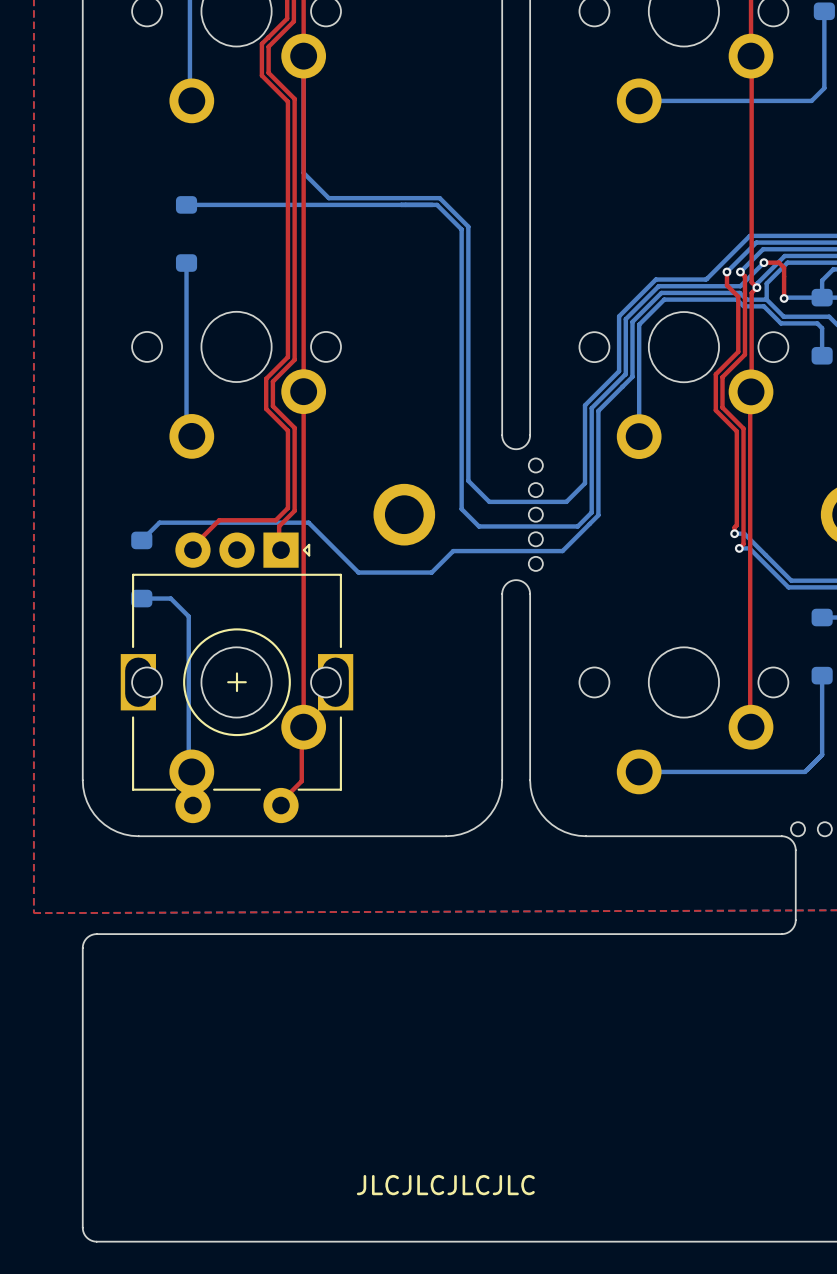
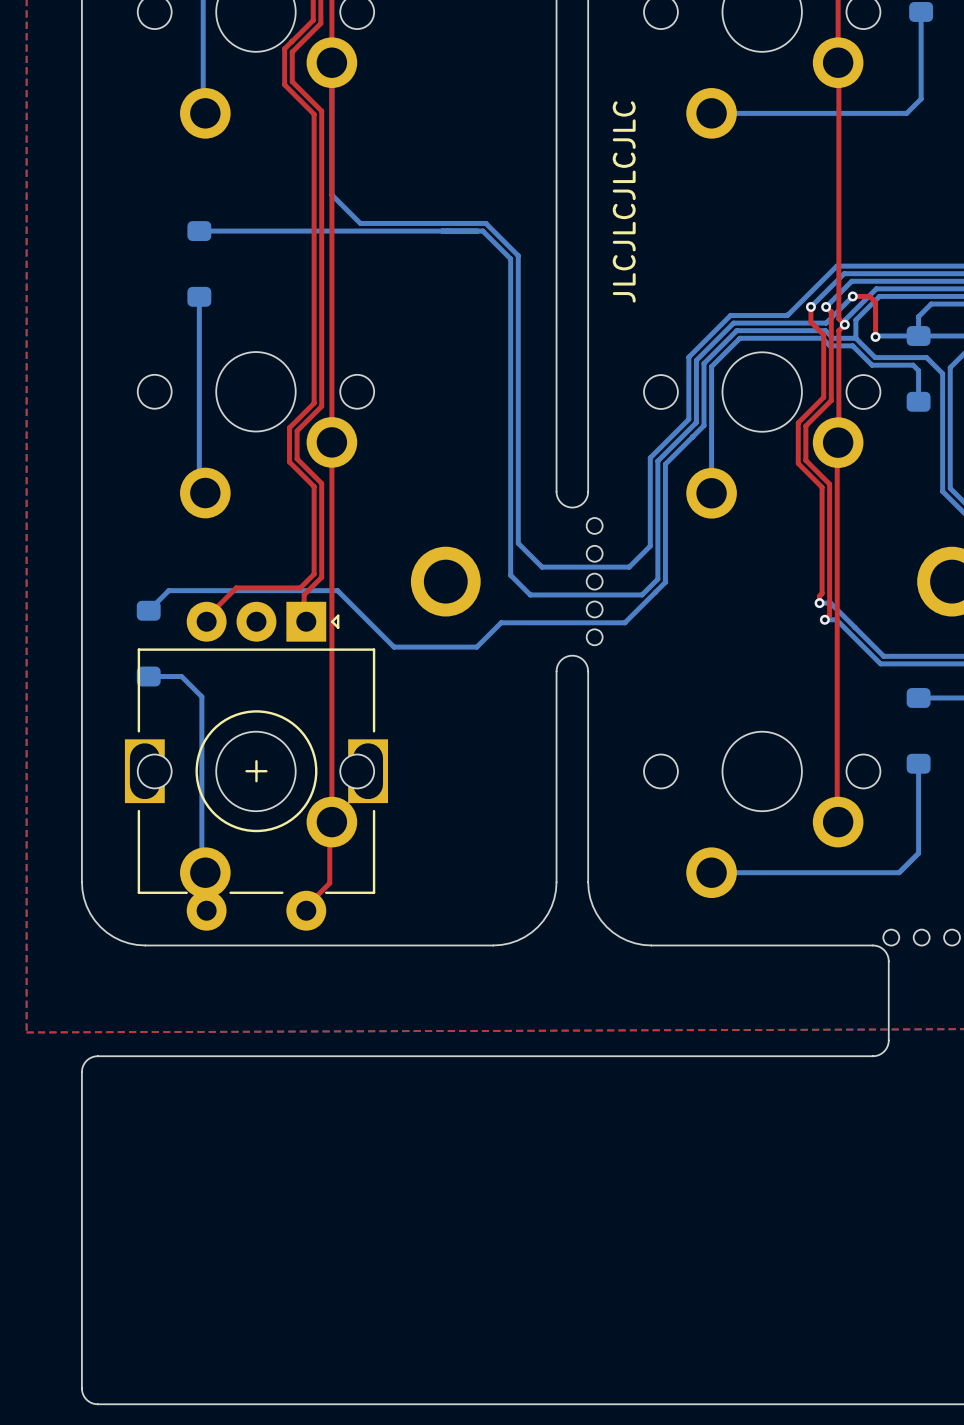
text: none -> JLCJLCJLCJLC (624, 201)
text: JLCJLCJLCJLC (445, 1185) -> none

